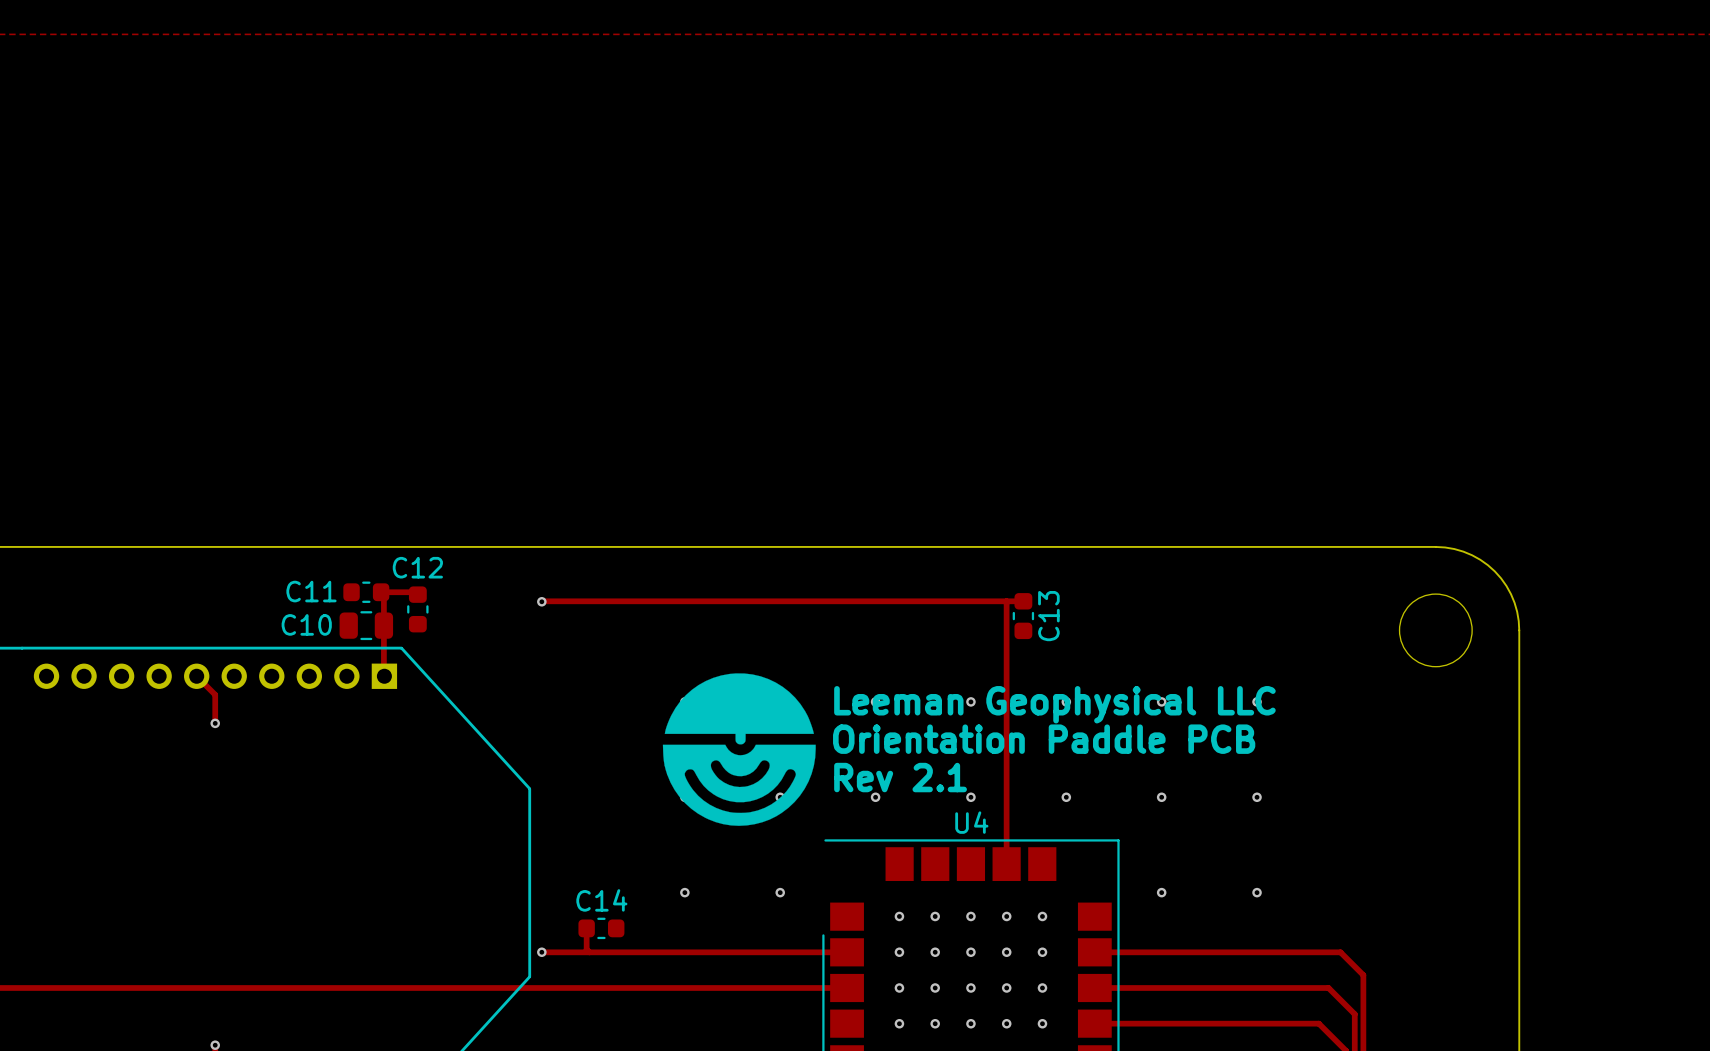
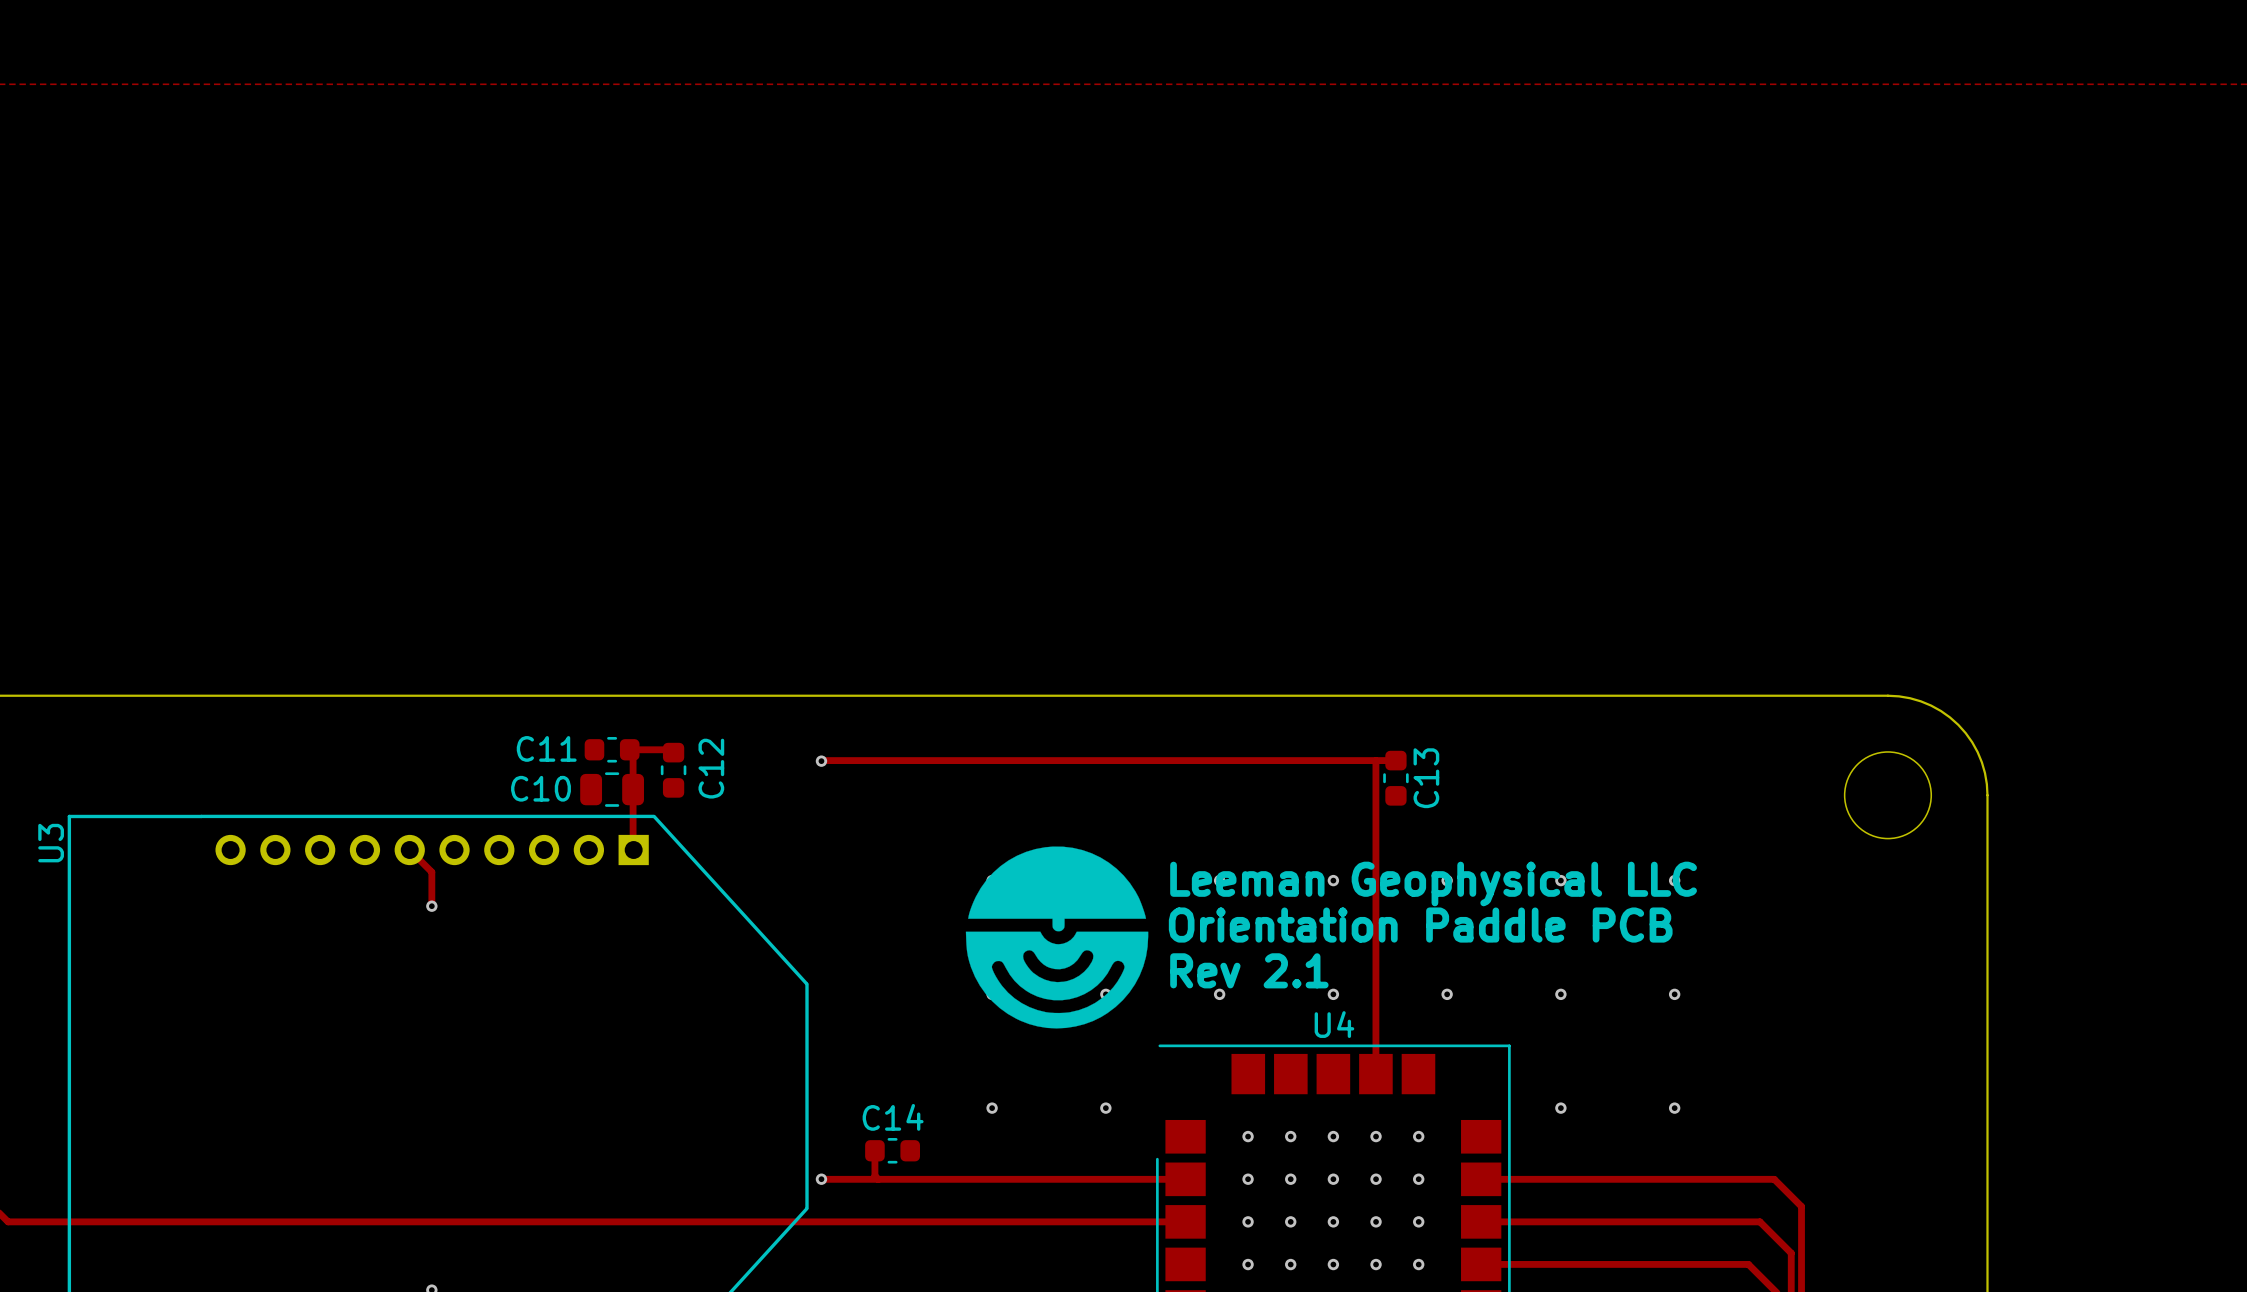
C12 name rotation: 0° (417, 567) -> 90° counterclockwise (711, 768)

